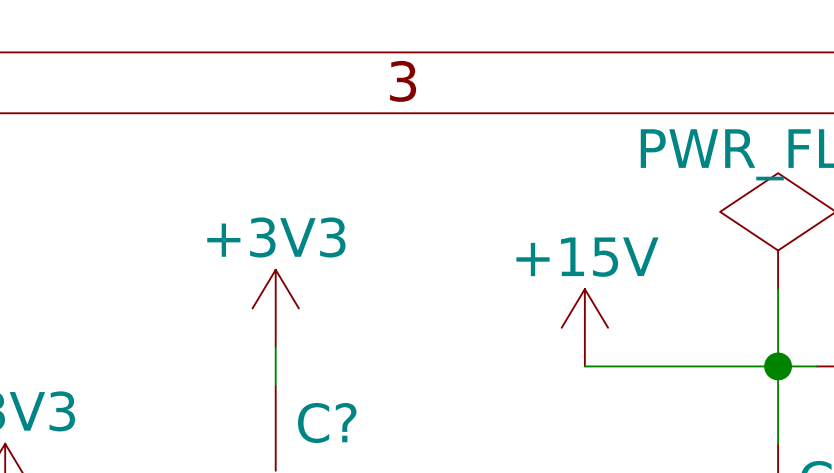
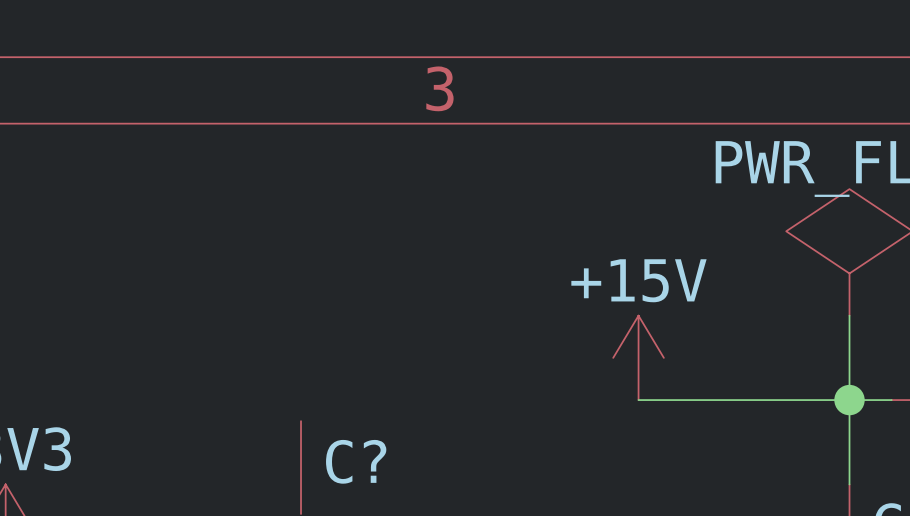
power symbol: +3V3 (275, 308) -> none
wire: (275, 347) (275, 385) -> none

